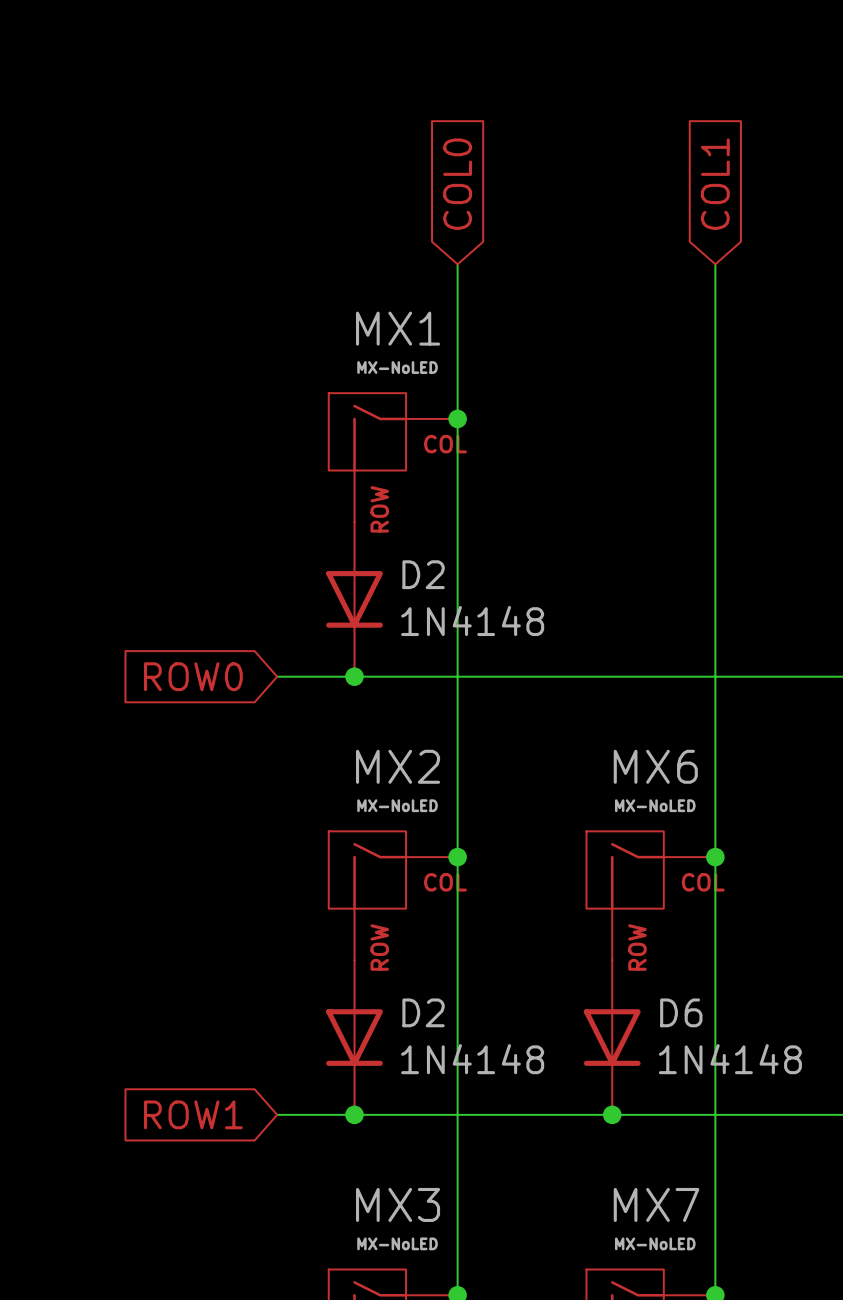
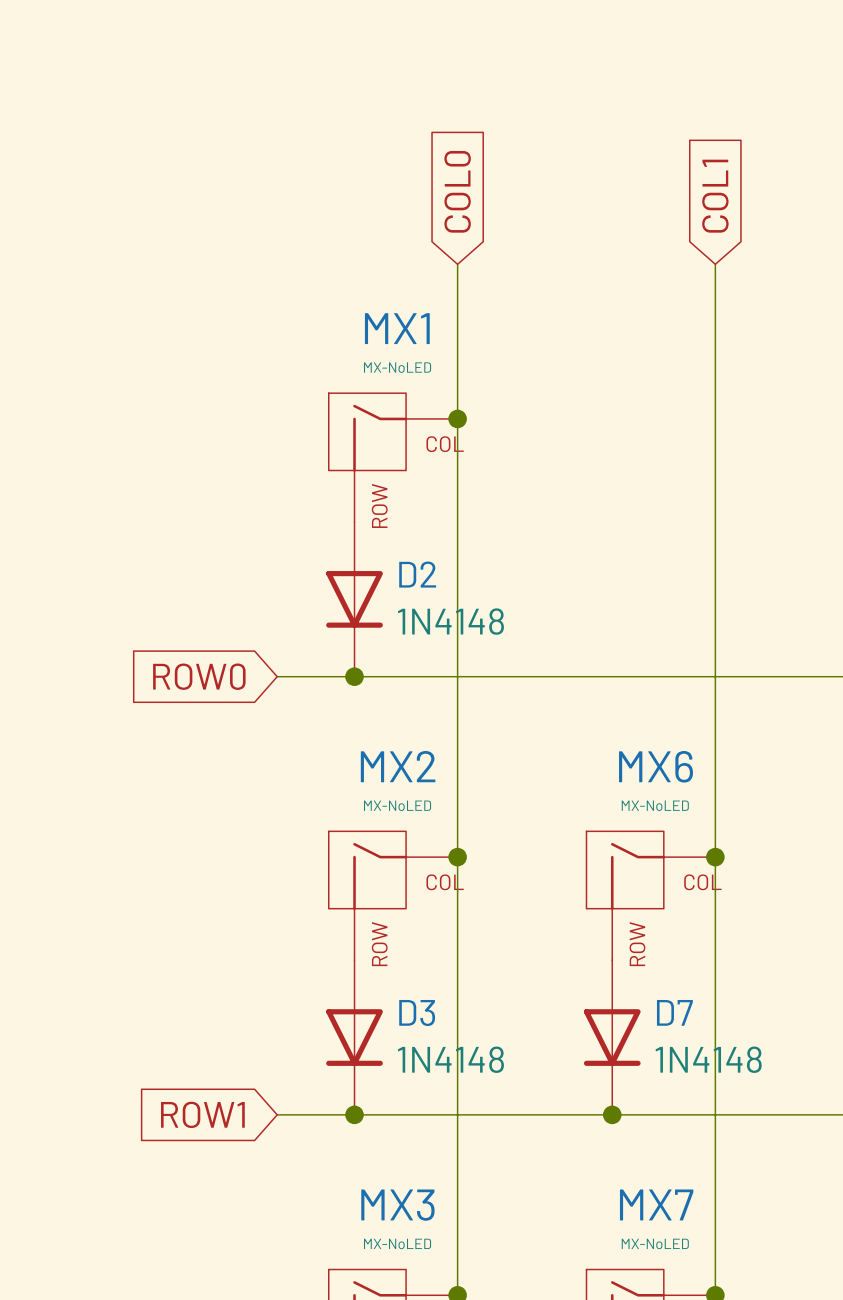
D2 name: D2 (423, 1012) -> D3 (417, 1013)
D6 name: D6 (681, 1012) -> D7 (674, 1012)

